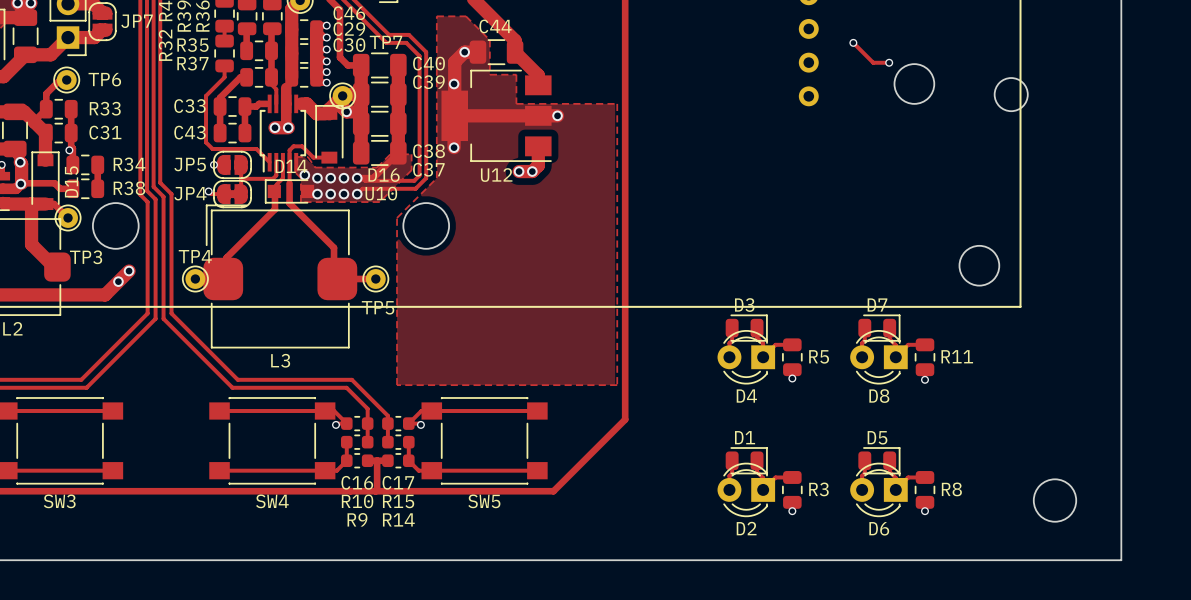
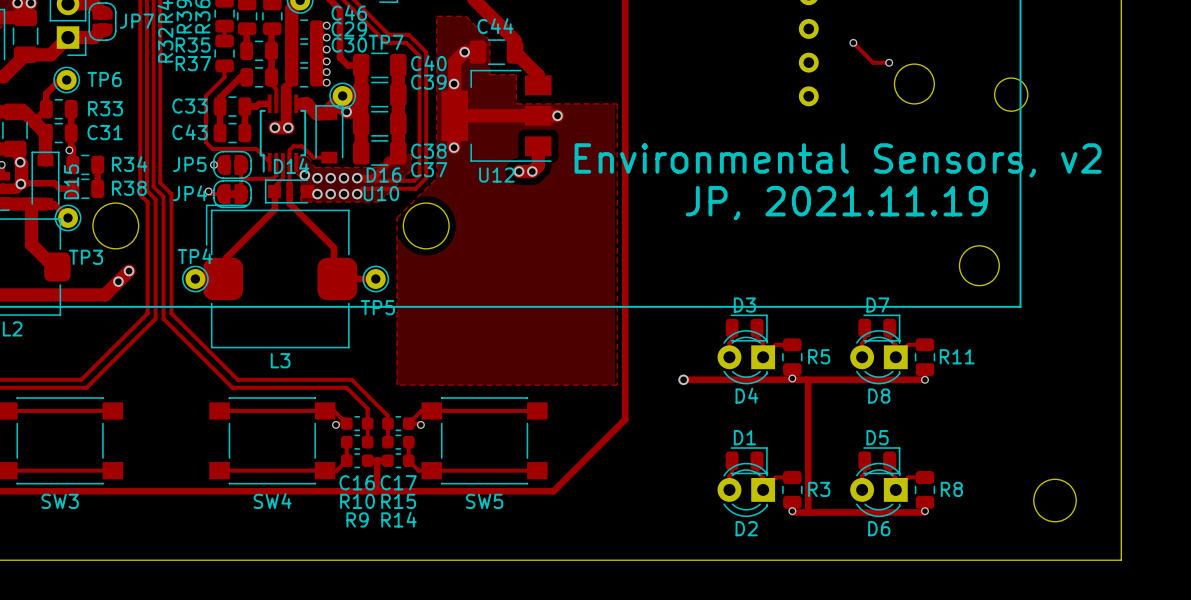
text: none -> Environmental Sensors, v2 (838, 160)
text: none -> JP, 2021.11.19 (836, 203)
track: none -> (683, 379) (925, 379)
via: none -> (683, 379)
track: none -> (805, 379) (808, 382) (808, 512)
track: none -> (792, 511) (925, 511)

